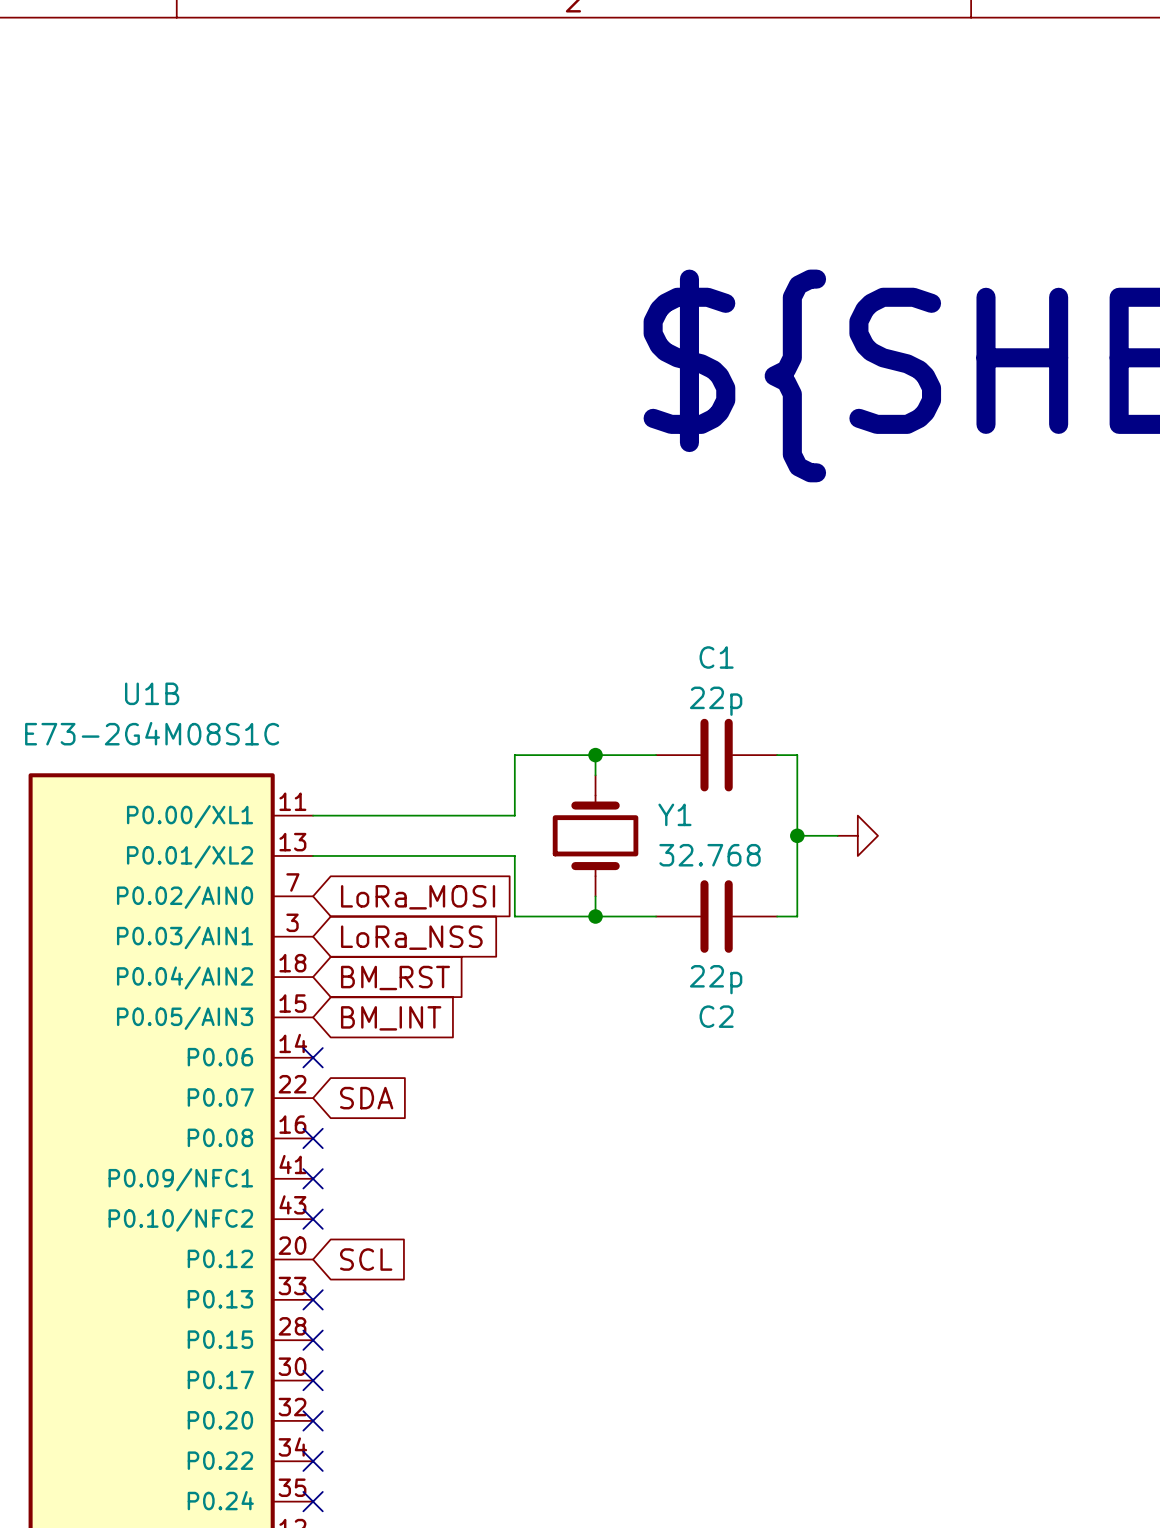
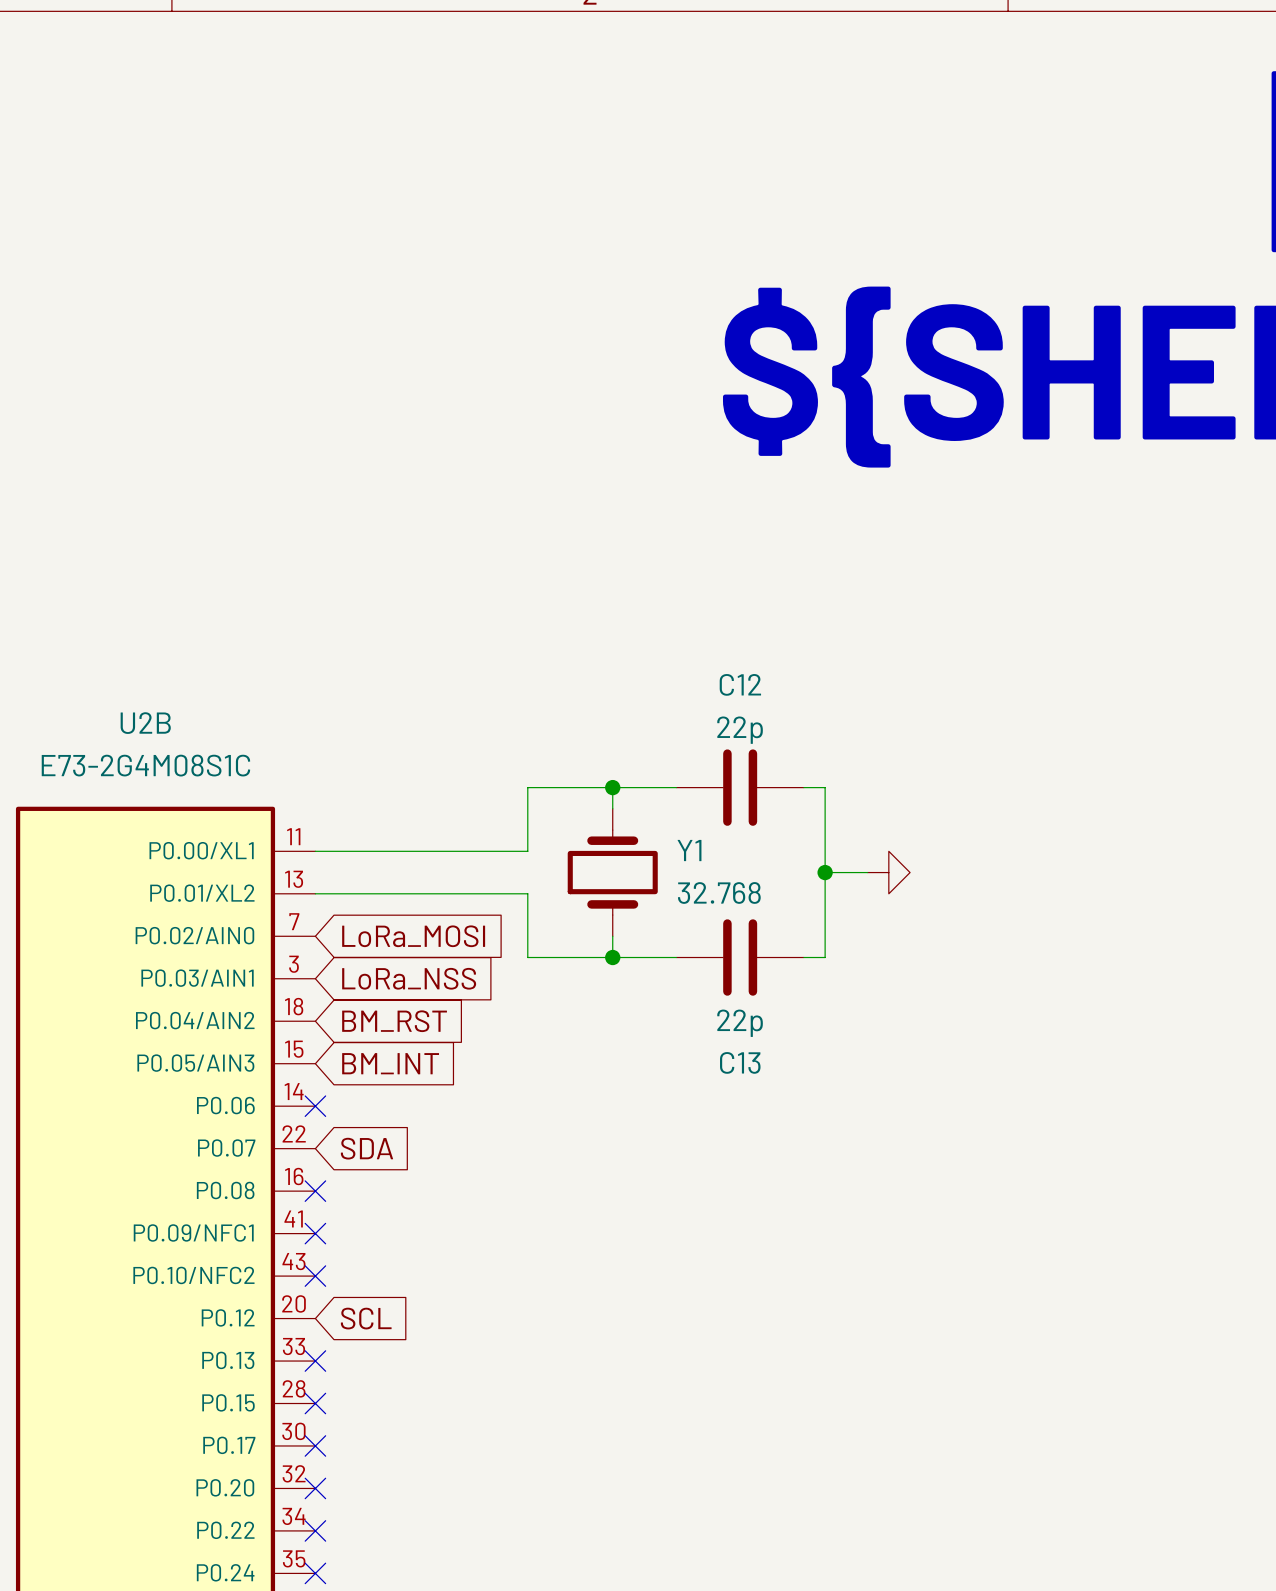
C1 name: C1 (716, 657) -> C12 (740, 684)
U1B name: U1B (152, 693) -> U2B (145, 723)
C2 name: C2 (716, 1016) -> C13 (740, 1062)

